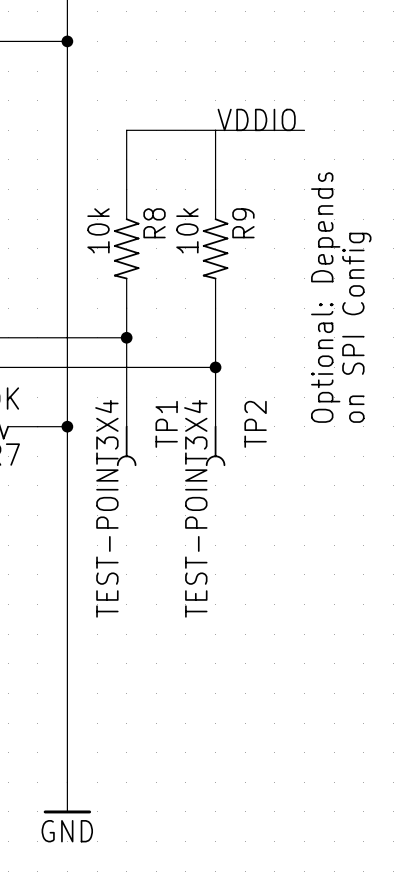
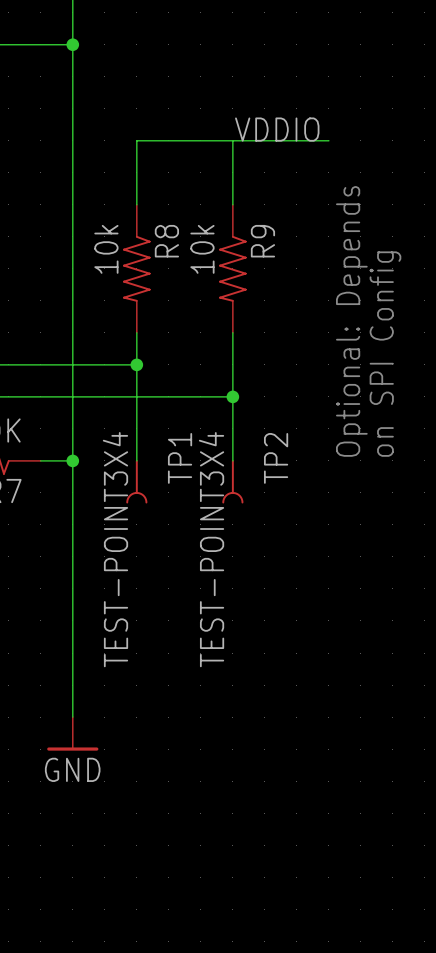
wire: (67, 663) (67, 782) -> none
power symbol position: GND (67, 797) -> GND (72, 733)

